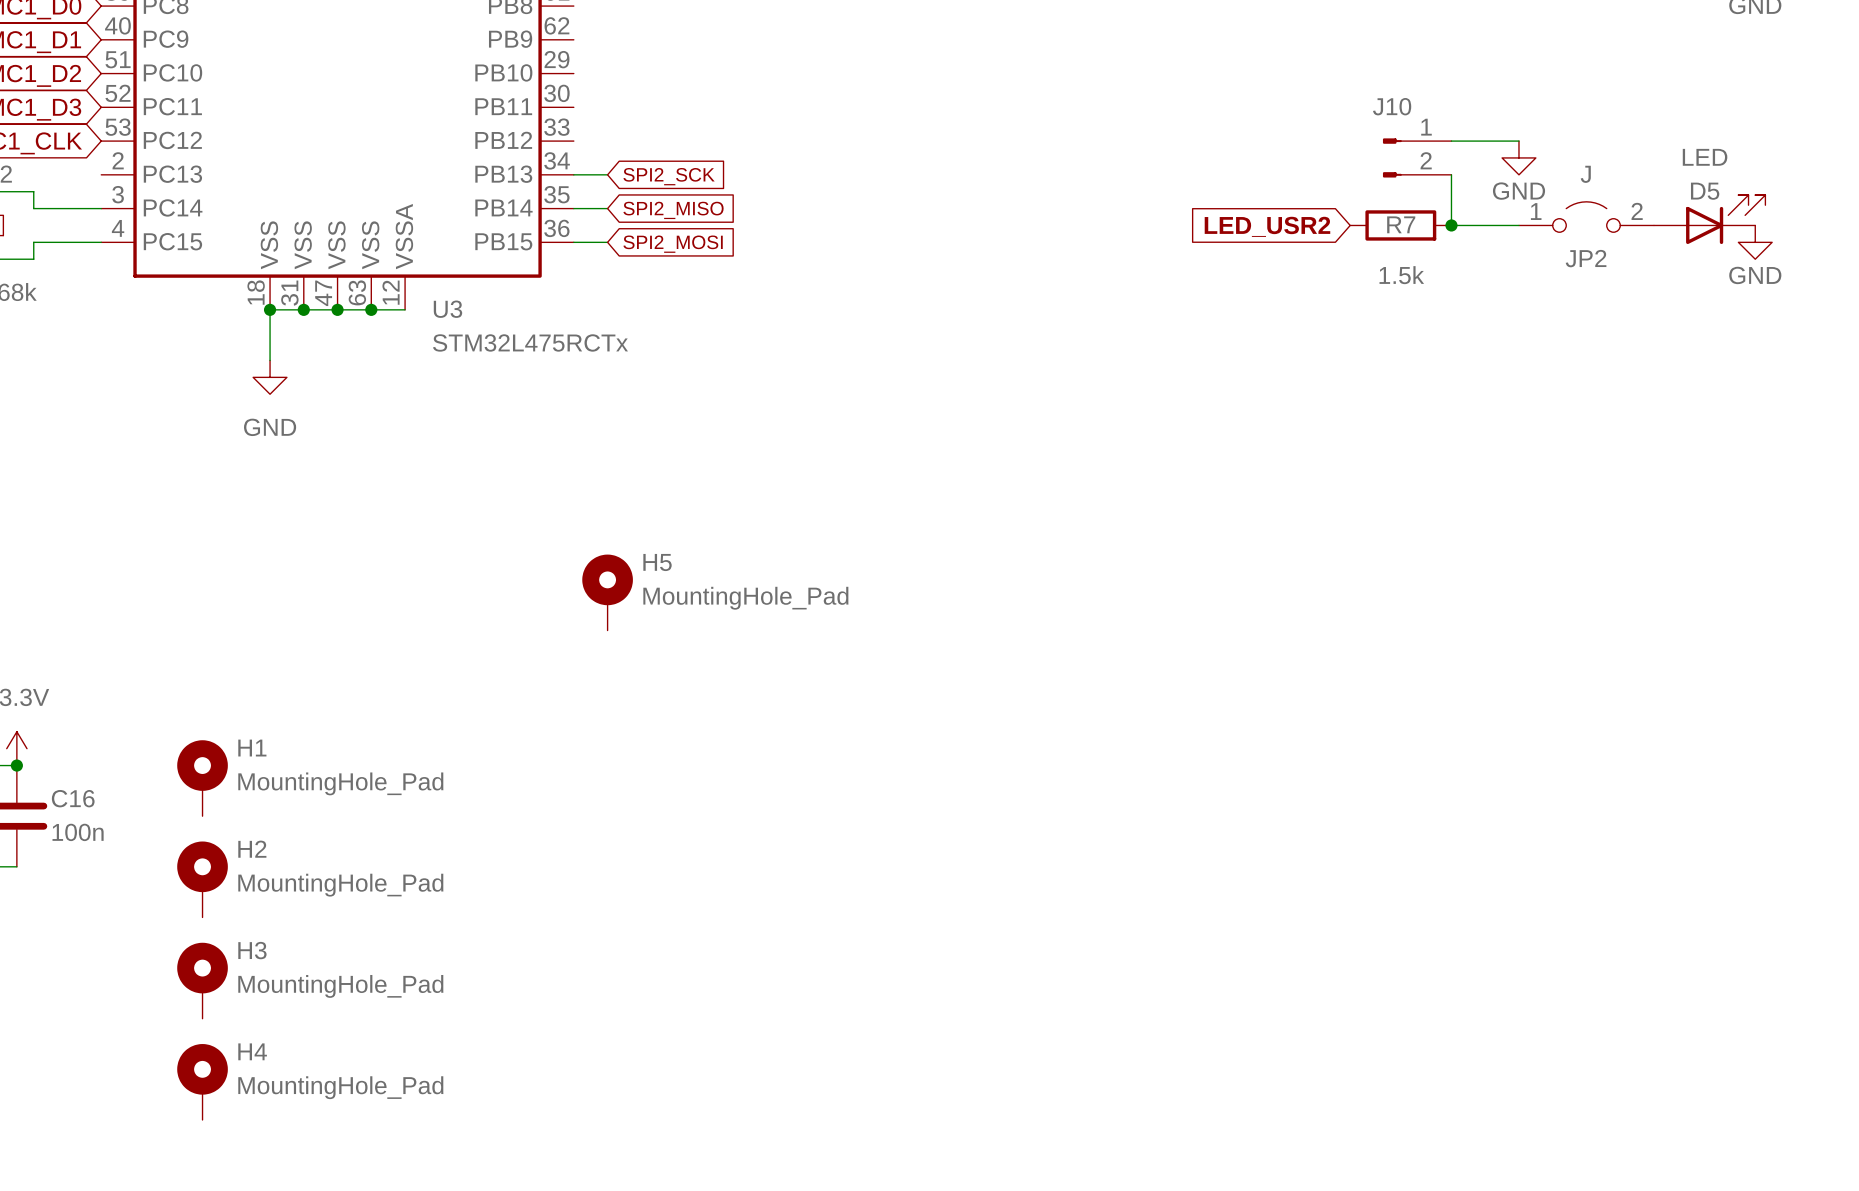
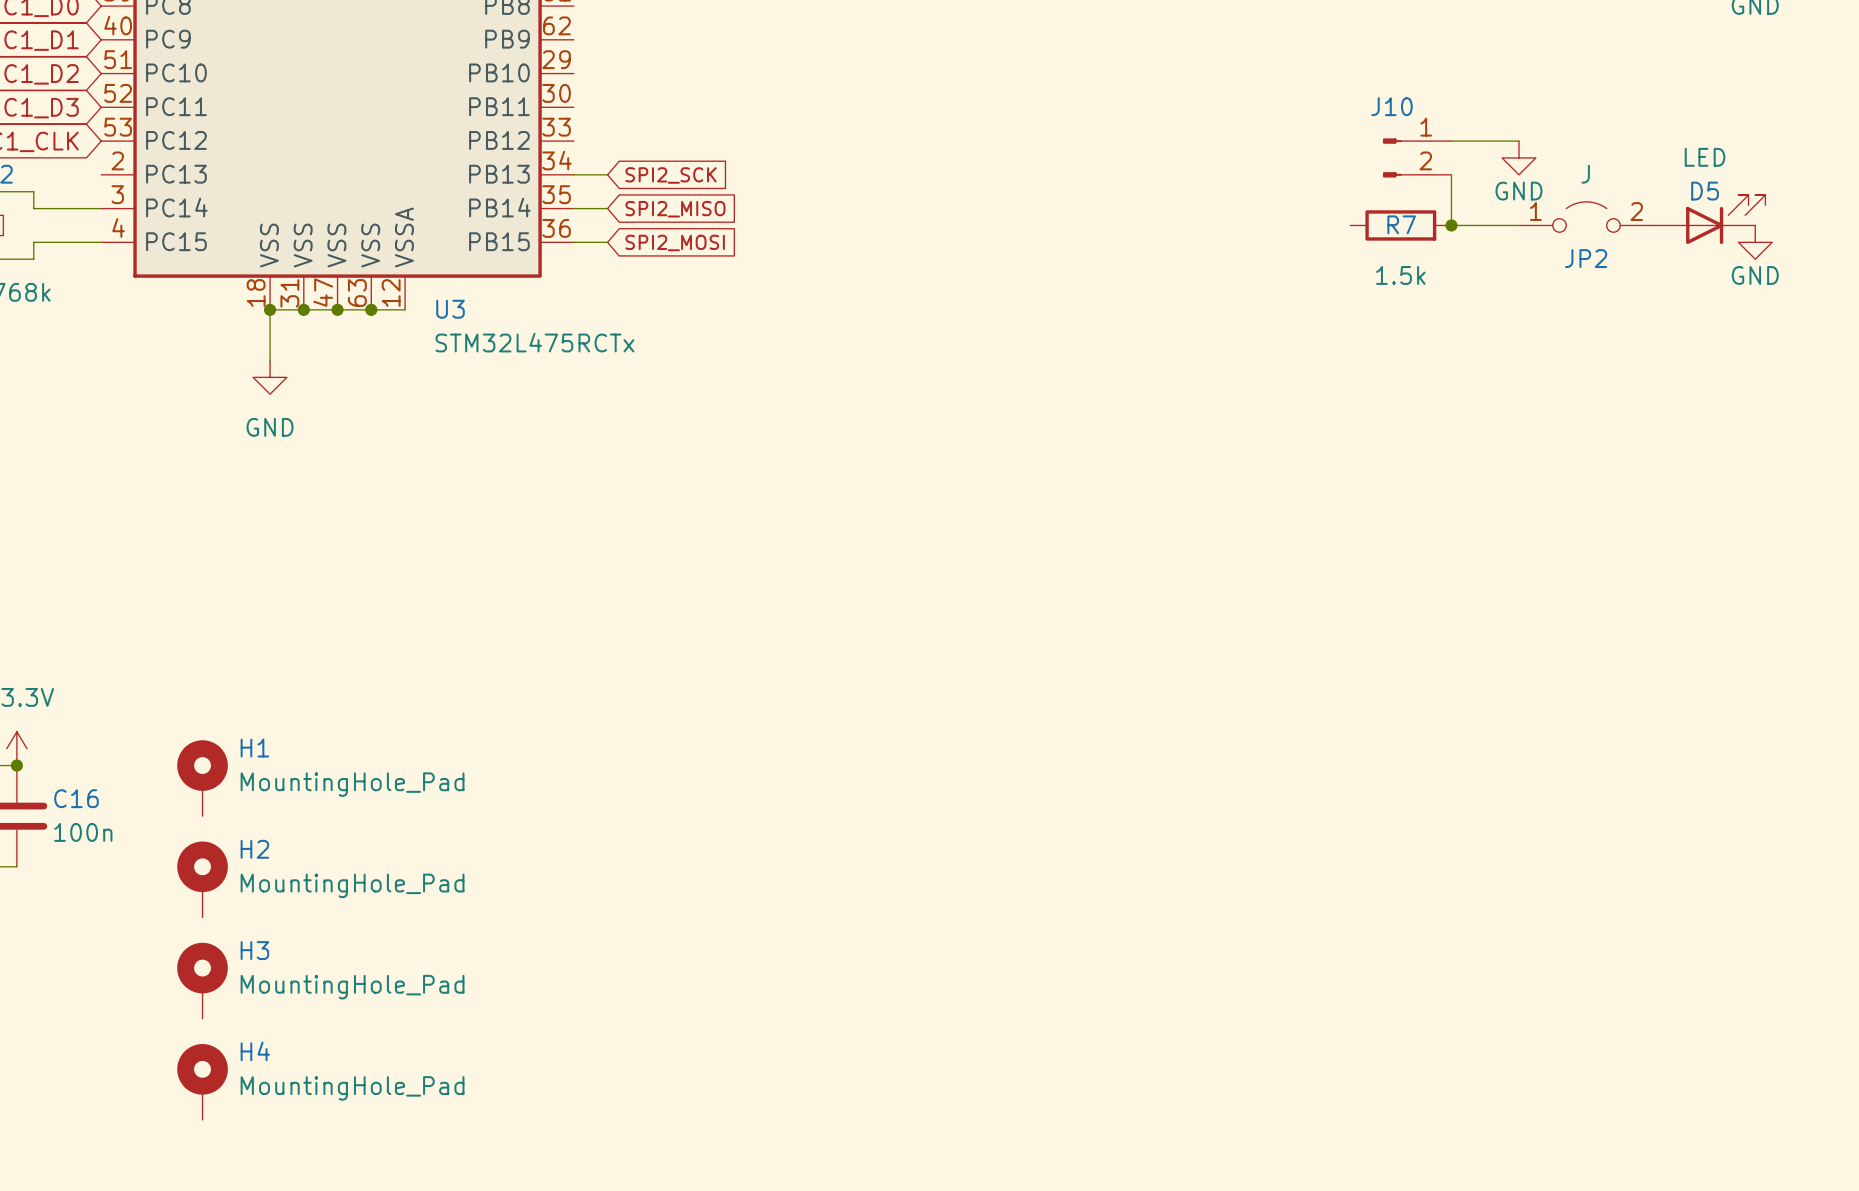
global label: LED_USR2 (1267, 226) -> none
H5: MountingHole_Pad (607, 592) -> none

